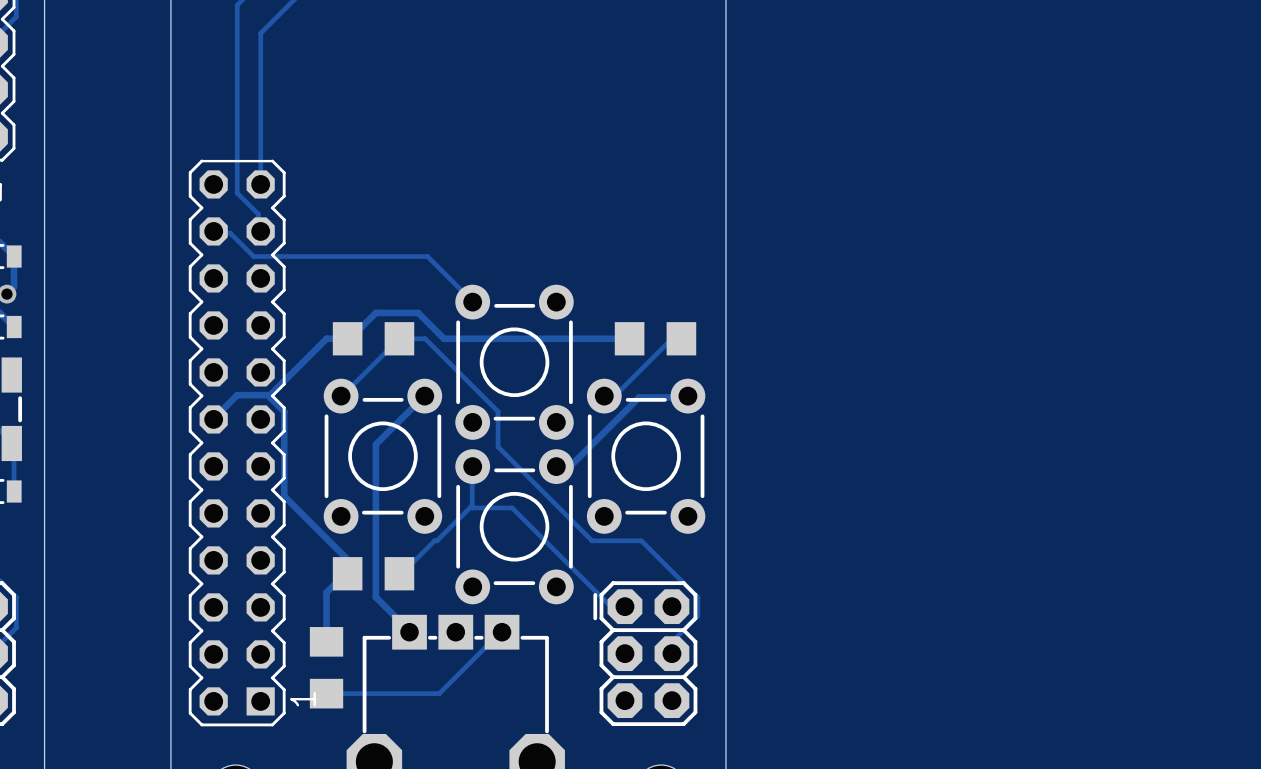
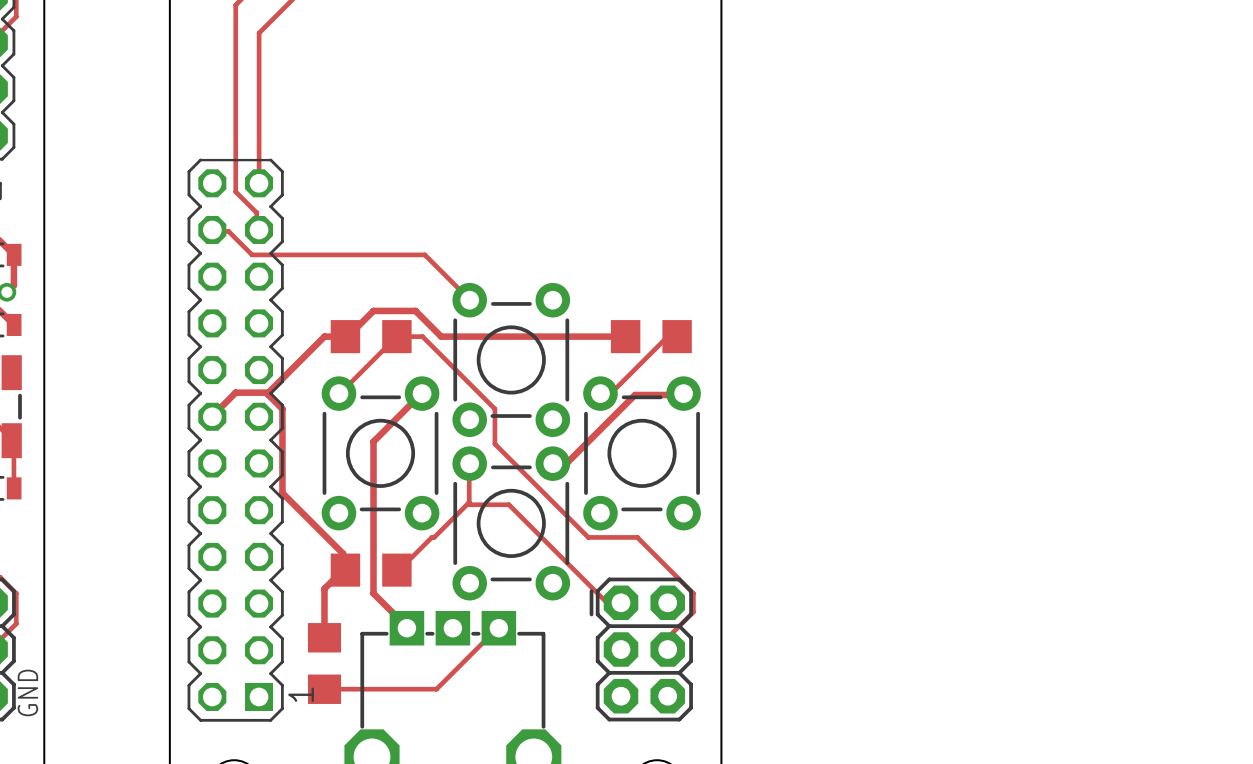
text: none -> GND (27, 692)

